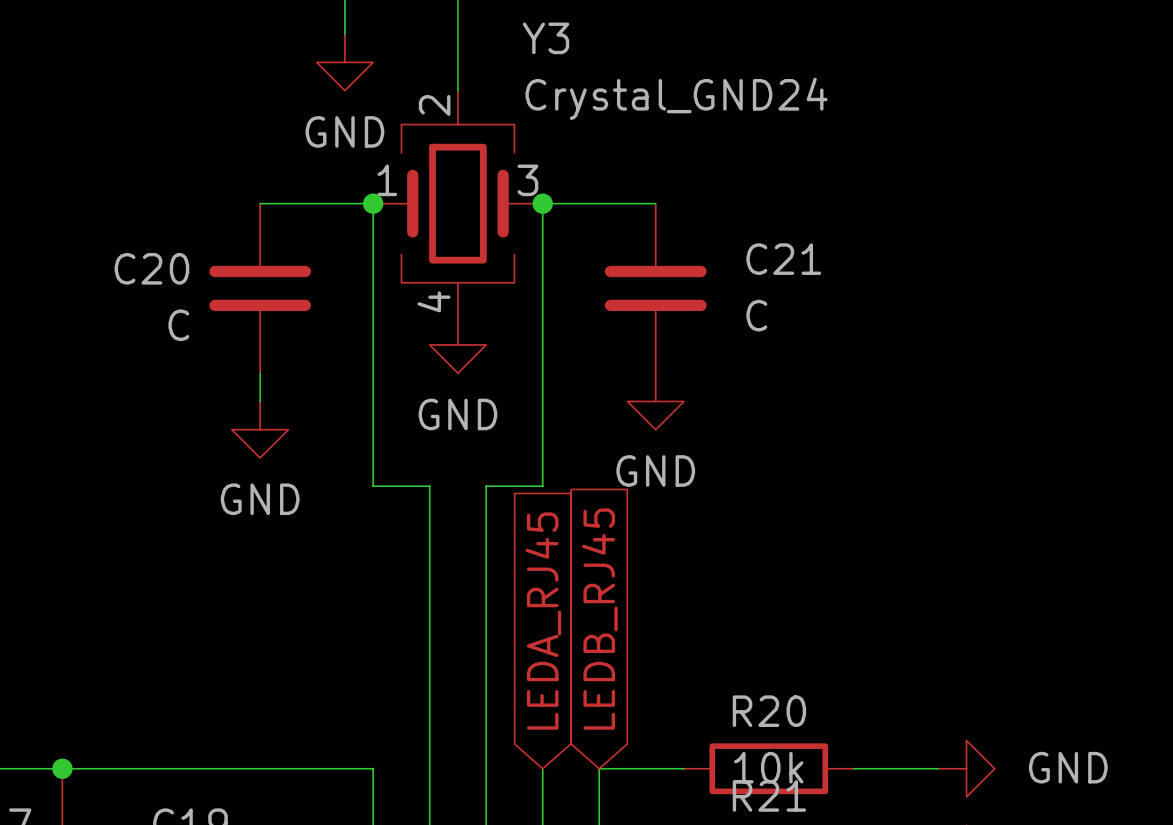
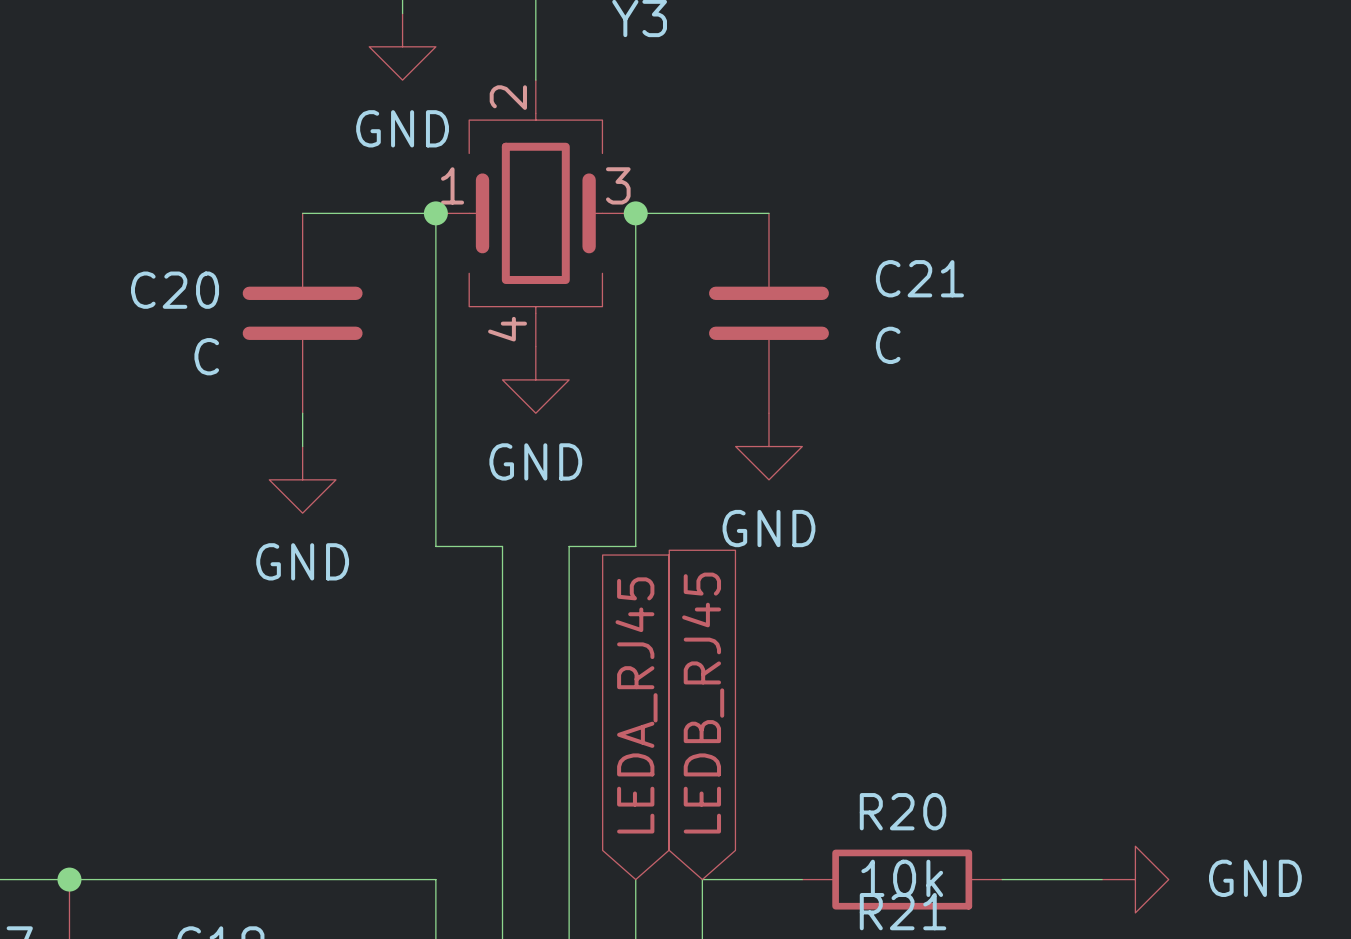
Y3 value: Crystal_GND24 (676, 98) -> none

